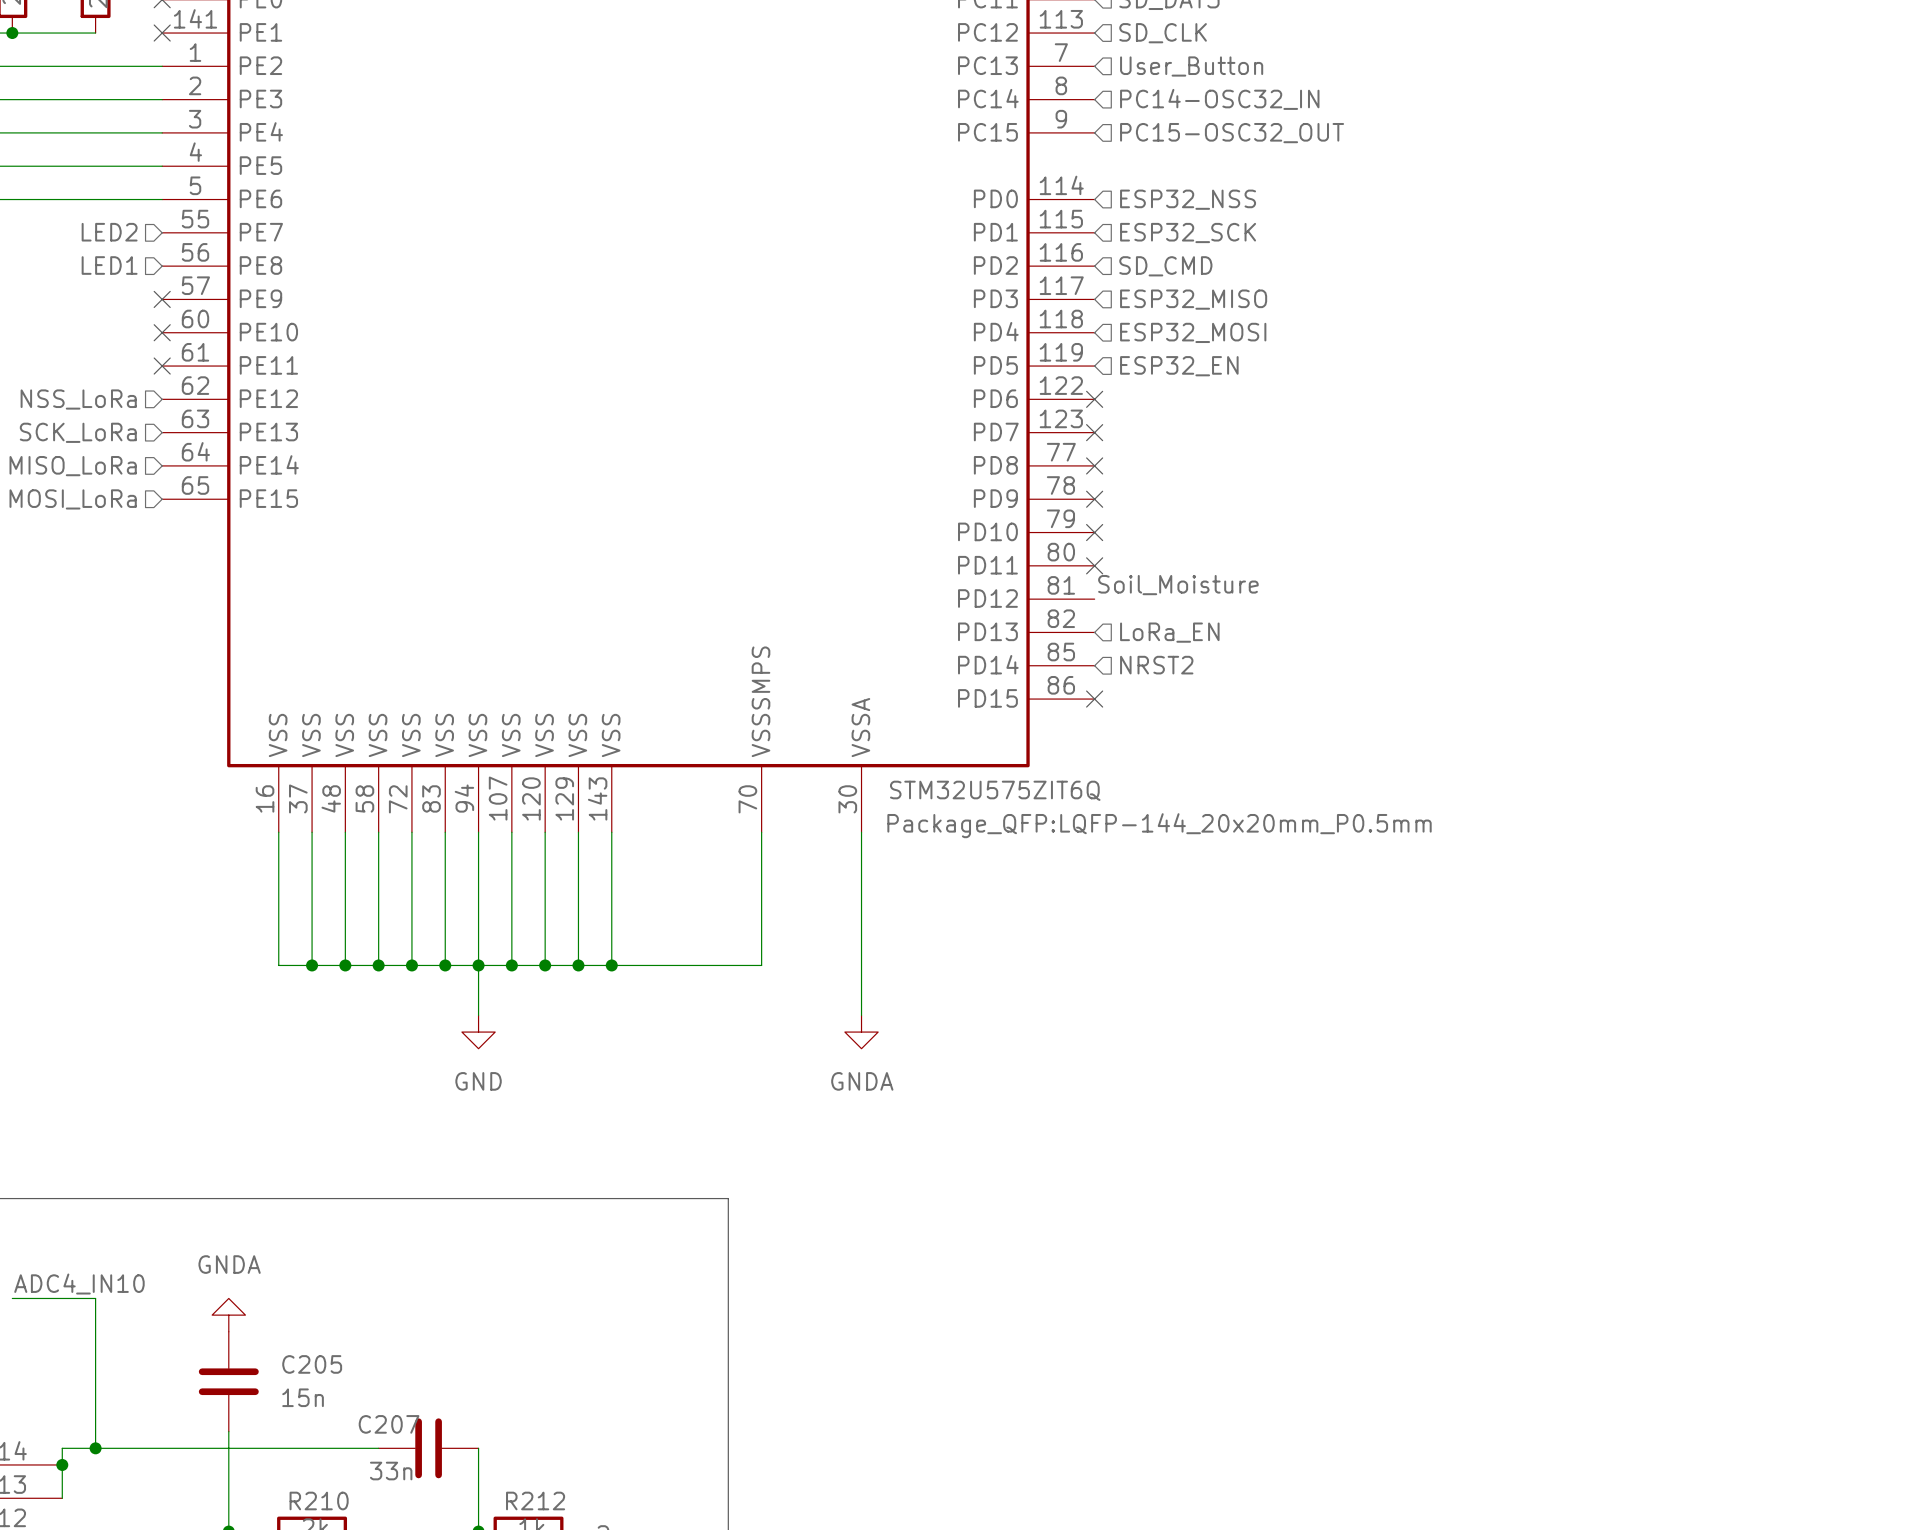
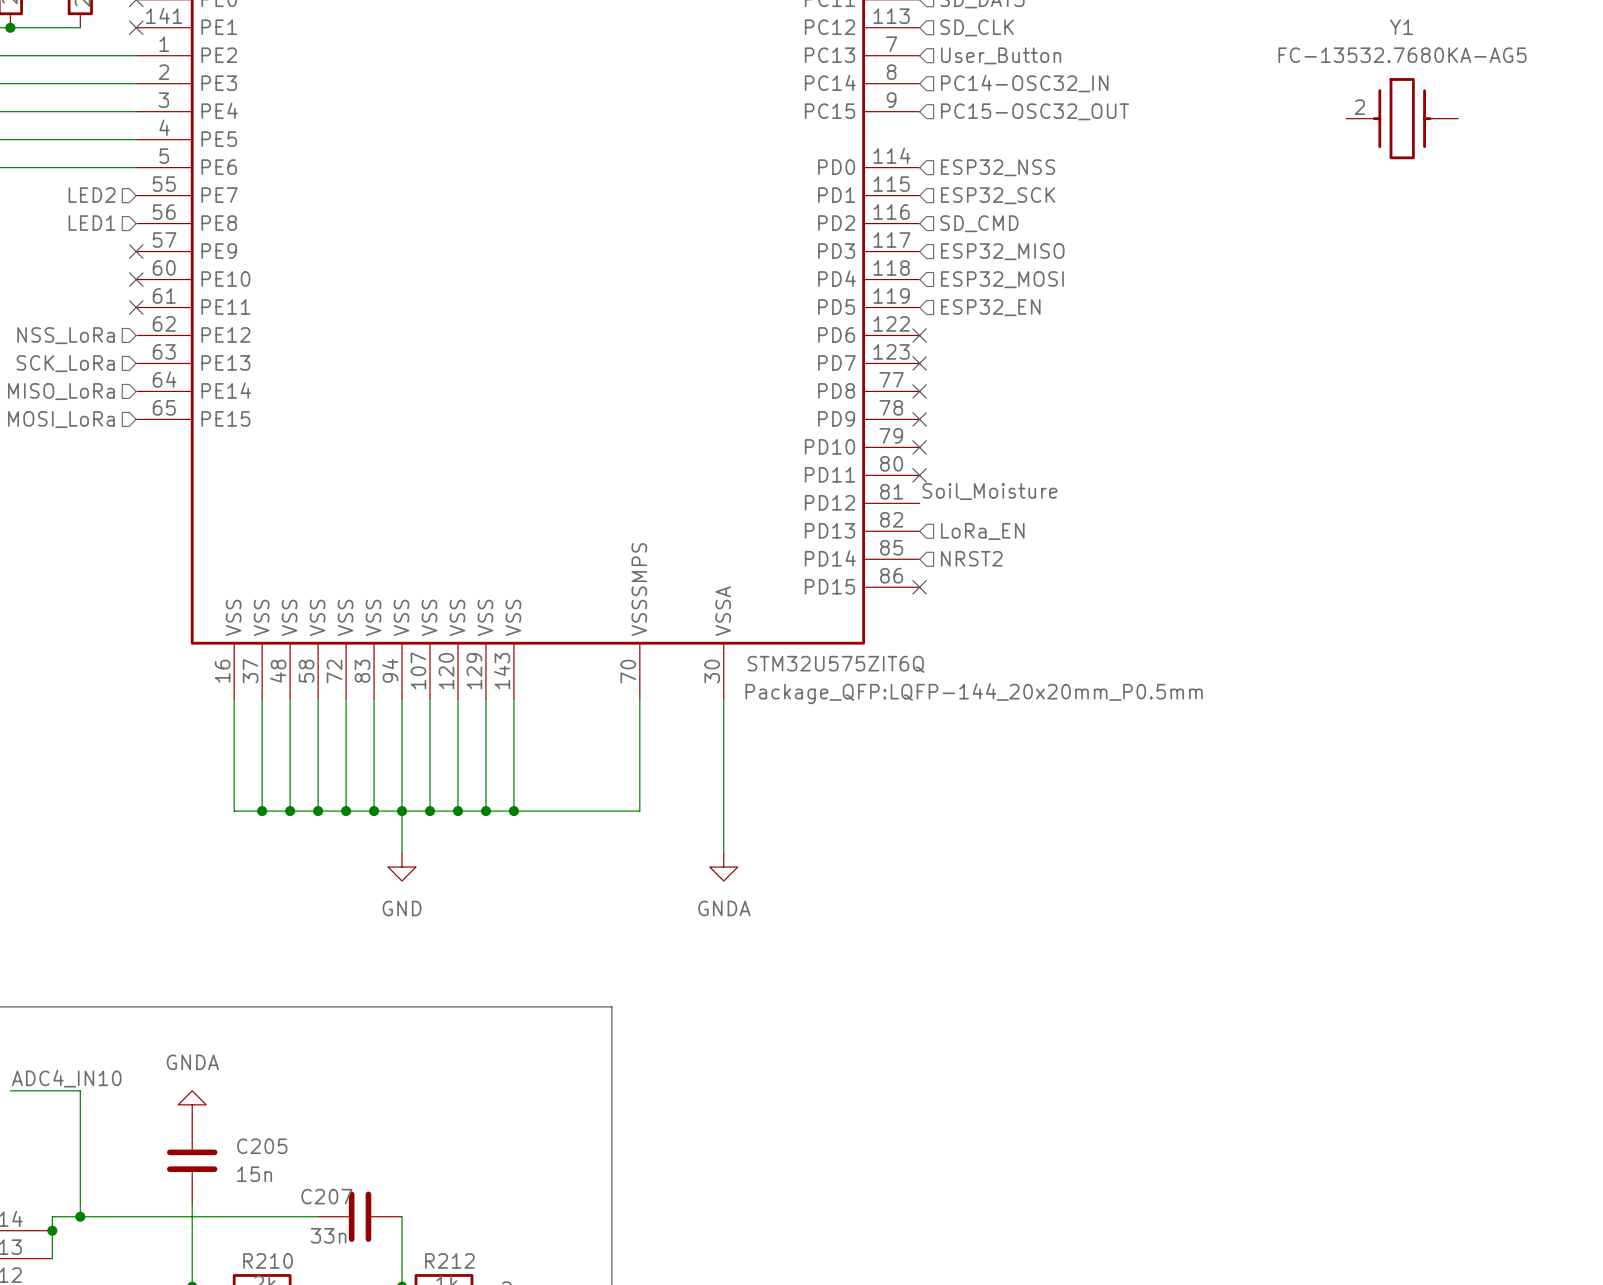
Y1: none -> FC-13532.7680KA-AG5 (1402, 118)

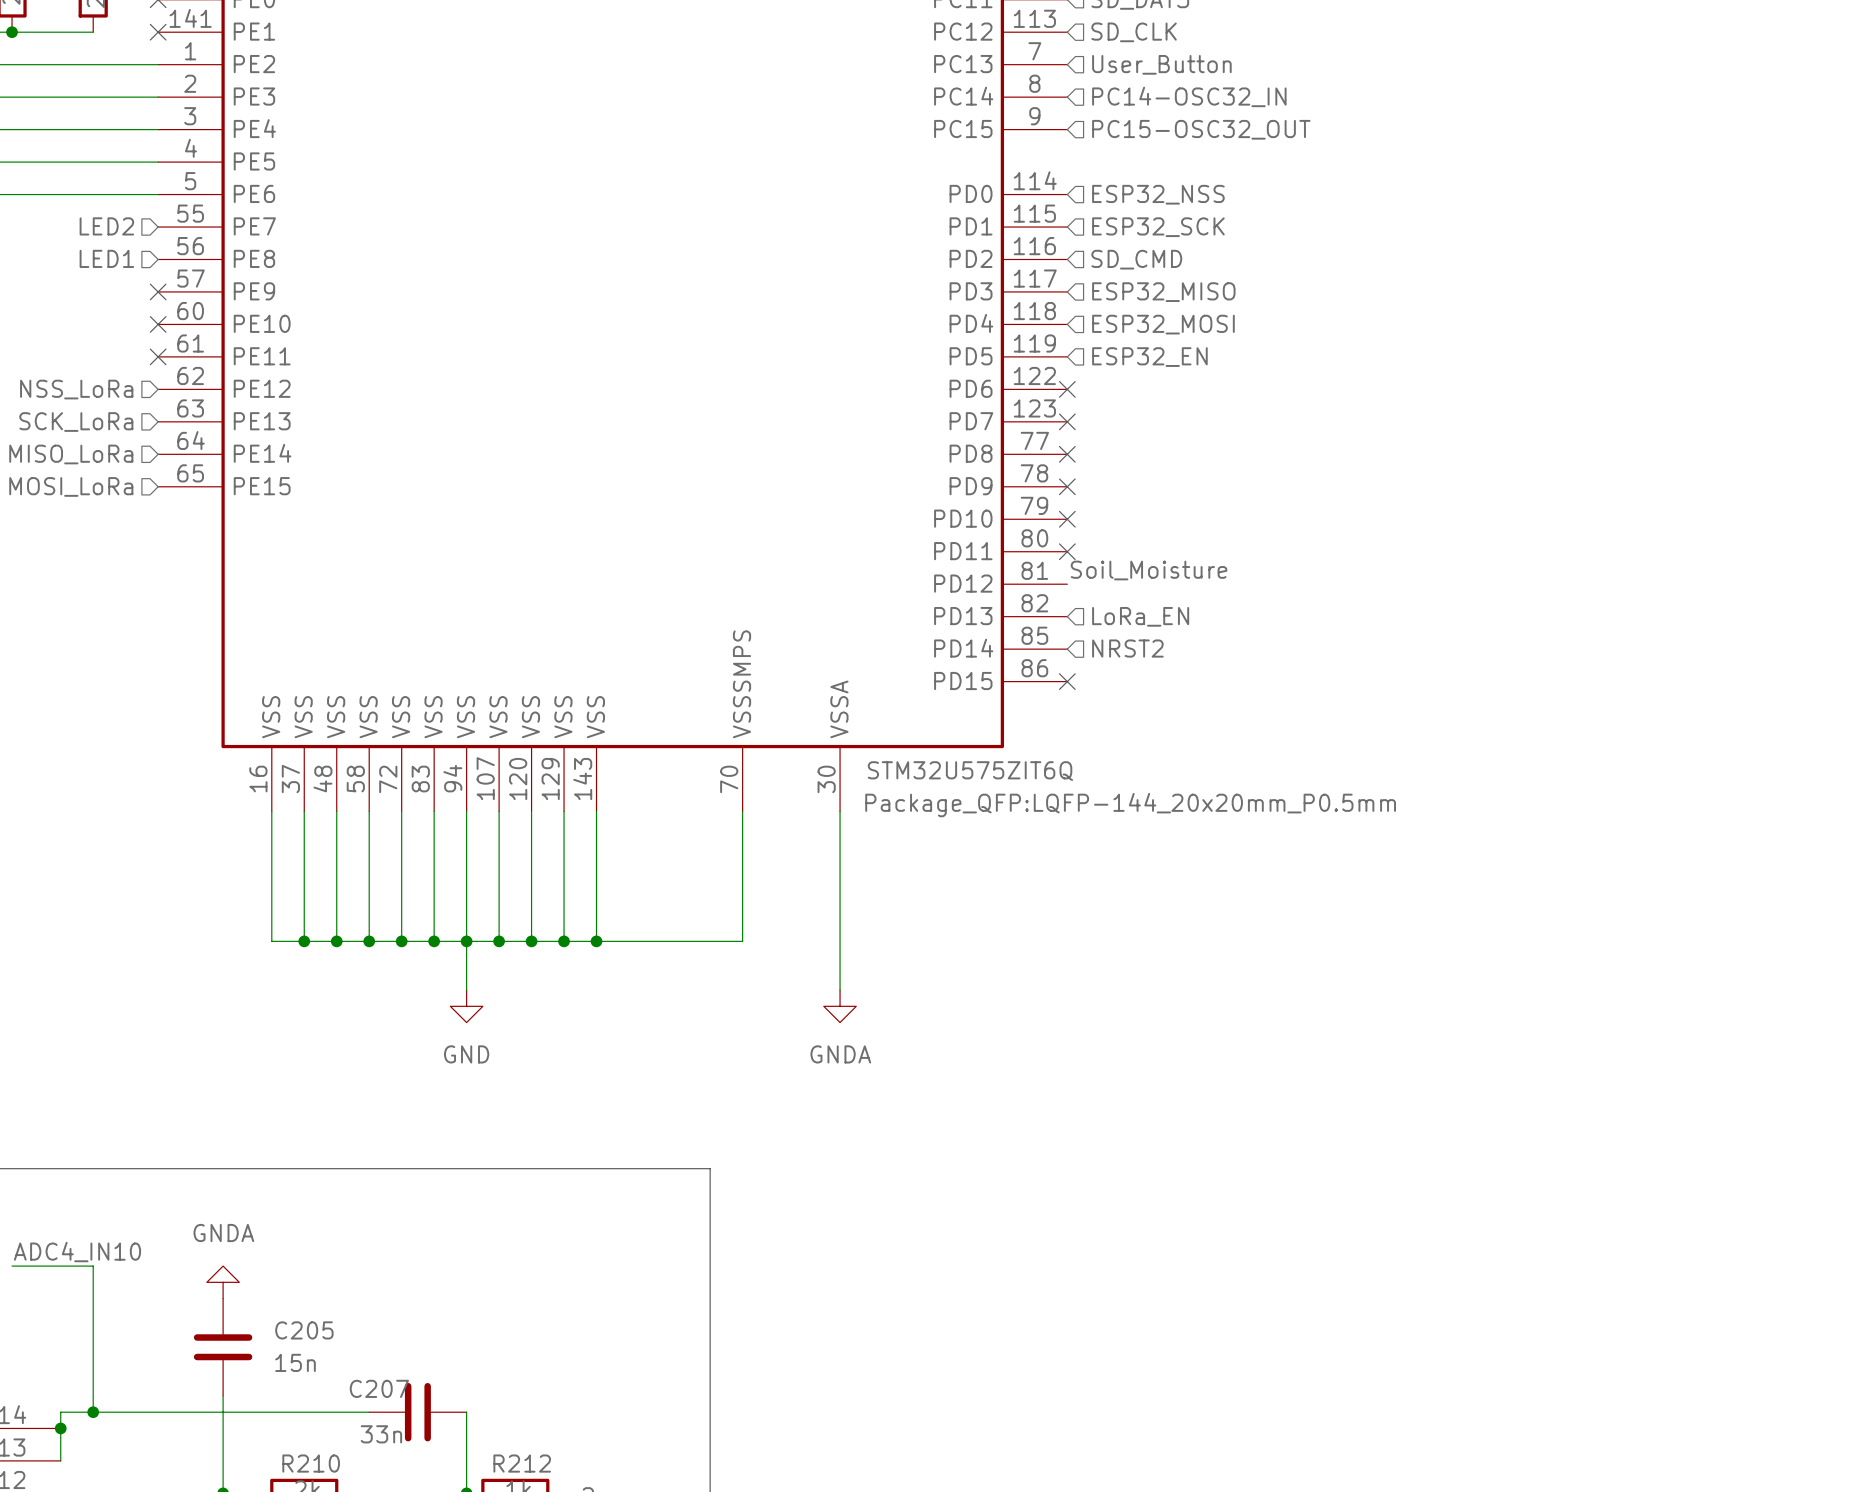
Y1: FC-13532.7680KA-AG5 (1402, 118) -> none

